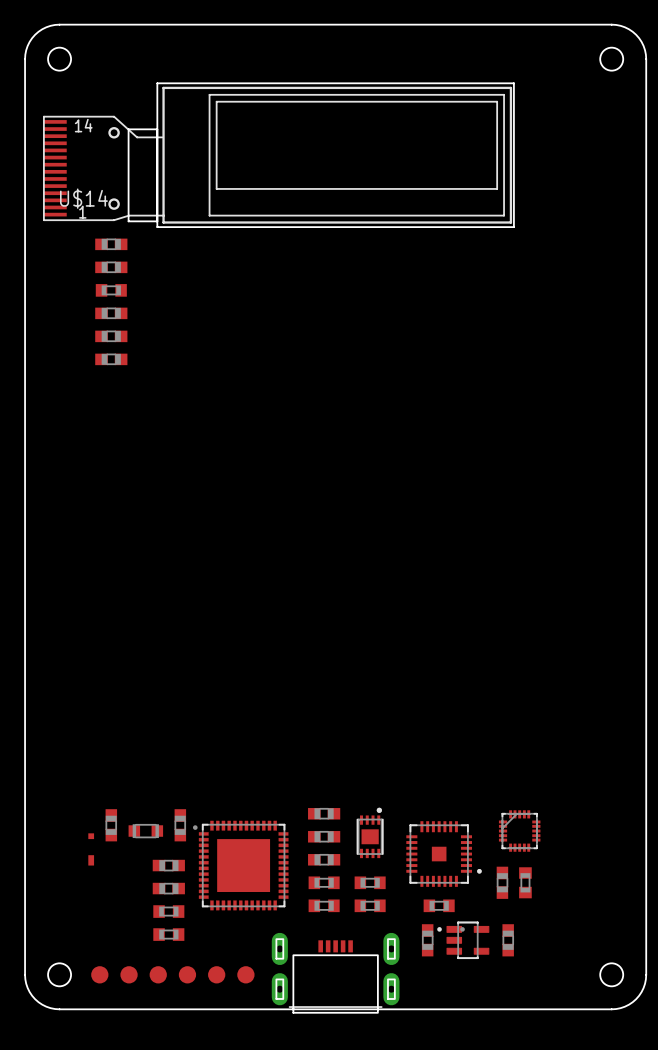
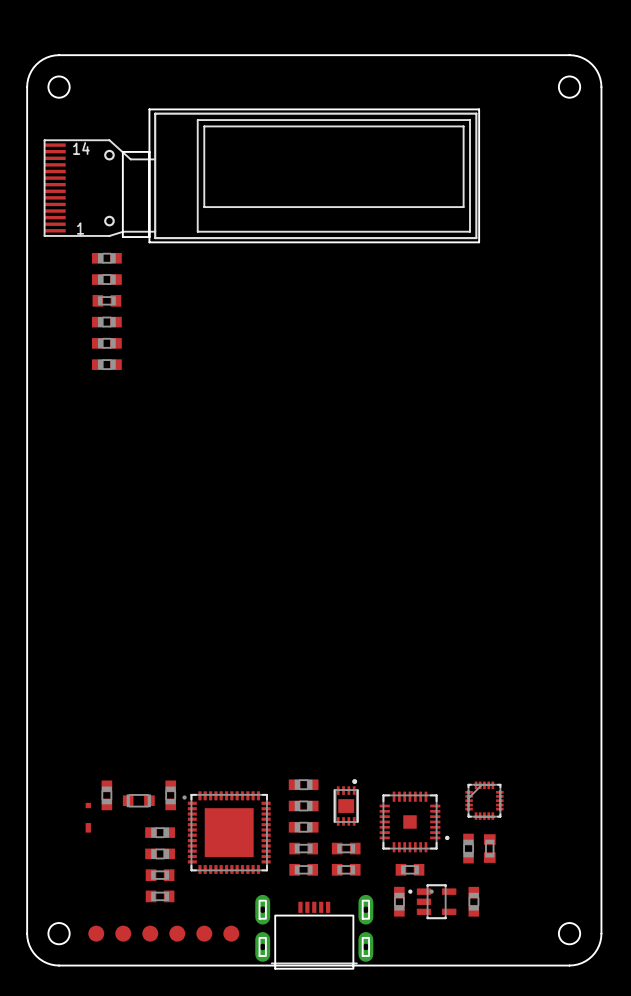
U$14 name: U$14 (83, 198) -> none

